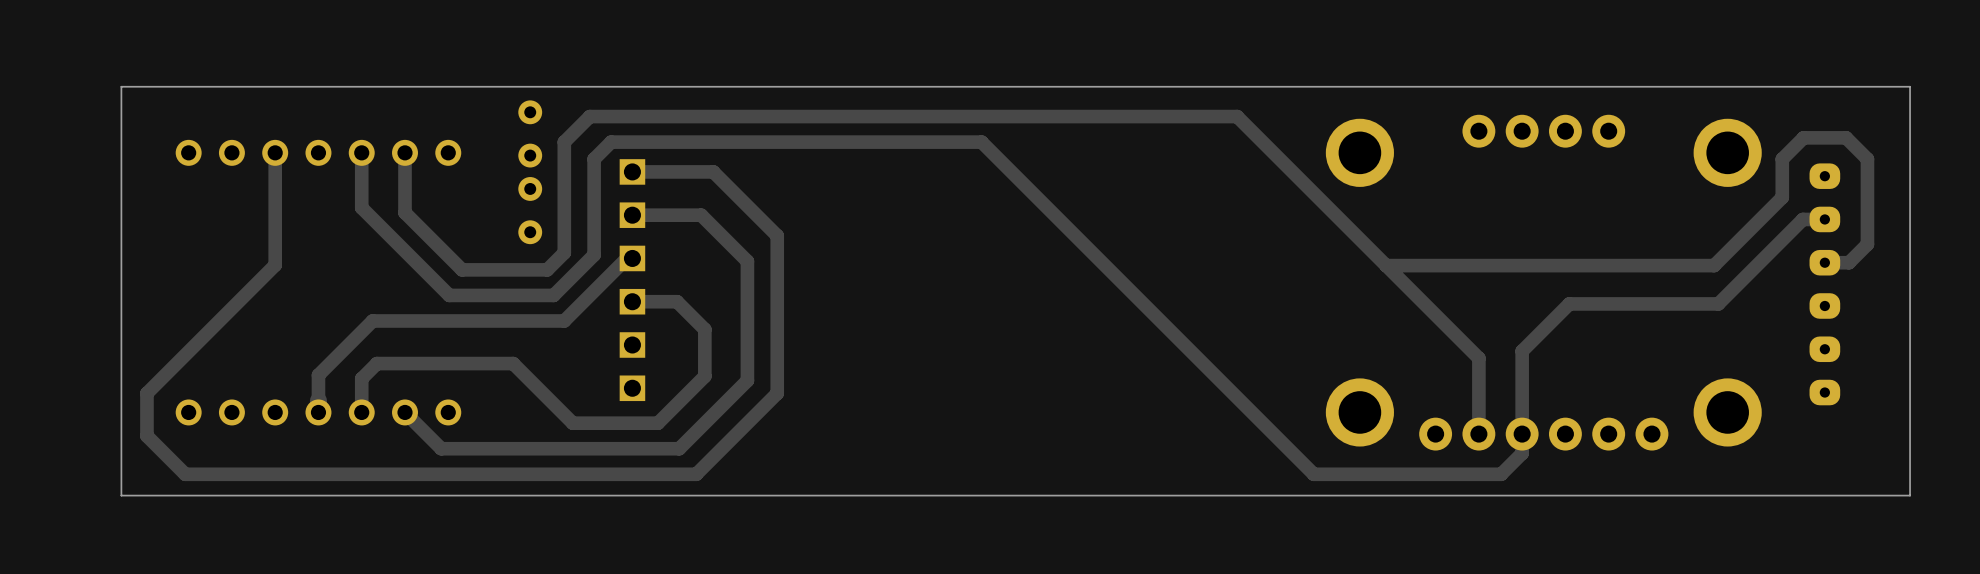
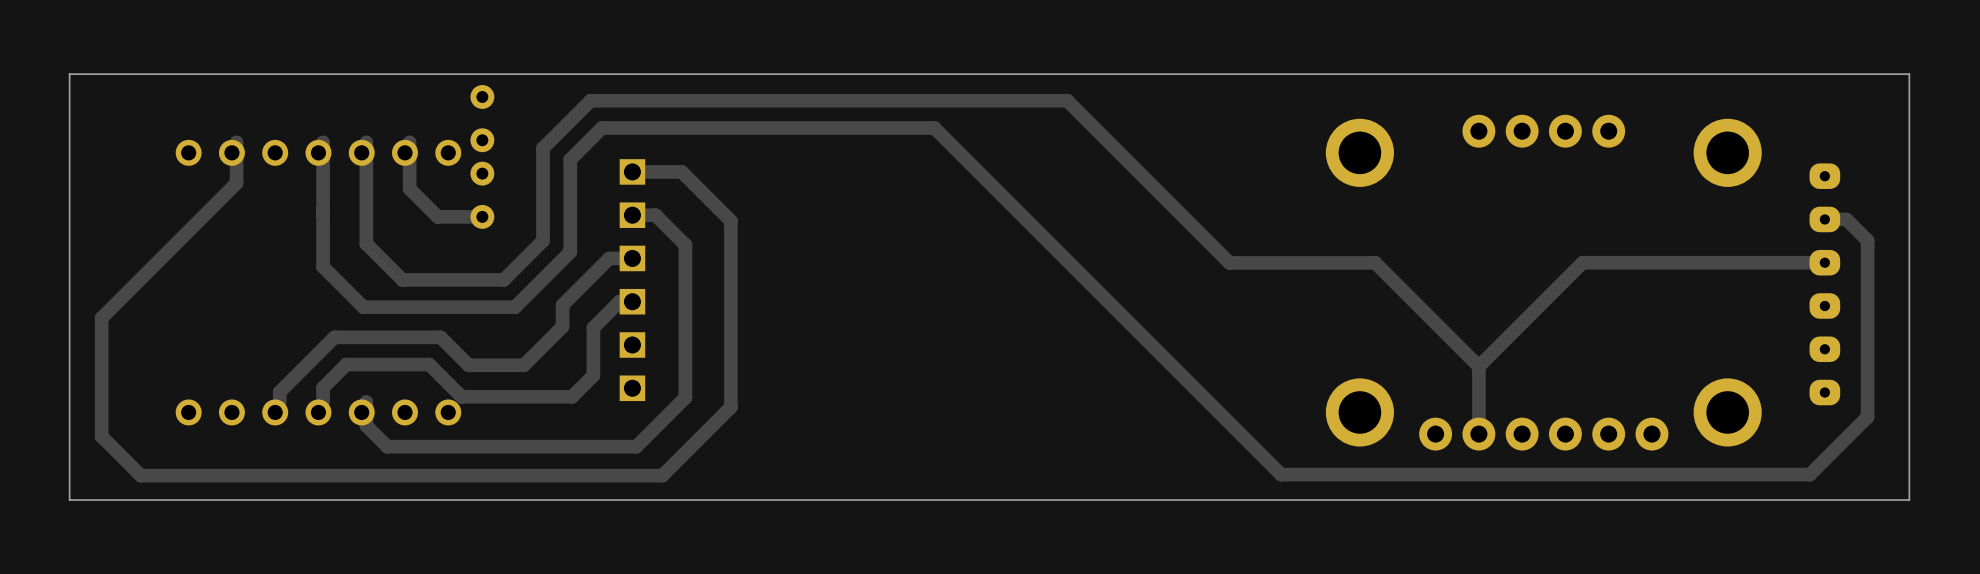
board edge: (1910, 86) (121, 86) (121, 495) (1910, 495) (1910, 86) -> (1909, 74) (1909, 500) (69, 500) (69, 74) (1909, 74)
part: none -> (482, 118)
part: (530, 133) -> none
track: none -> (409, 142) (409, 188) (437, 216) (482, 216)
track: (275, 152) (275, 265) (146, 393) (146, 435) (185, 474) (696, 474) (777, 393) (777, 235) (713, 171) (681, 171) -> (236, 142) (236, 183) (101, 318) (101, 436) (140, 475) (662, 475) (730, 407) (730, 220) (681, 171)
track: (361, 152) (361, 207) (449, 295) (553, 295) (594, 254) (594, 159) (611, 142) (981, 142) (1313, 474) (1501, 474) (1522, 453) (1522, 351) (1569, 303) (1718, 303) (1802, 219) (1824, 219) -> (323, 142) (323, 266) (363, 307) (515, 307) (570, 251) (570, 159) (601, 127) (934, 127) (1281, 474) (1809, 474) (1867, 416) (1867, 240) (1846, 219) (1824, 219)
track: (405, 152) (405, 212) (462, 269) (547, 269) (564, 252) (564, 142) (589, 116) (1237, 116) (1478, 358) (1478, 366) -> none
part: none -> (482, 195)
part: (530, 210) -> none
track: (655, 215) (701, 215) (747, 261) (747, 380) (679, 448) (441, 448) (405, 412) -> (655, 215) (685, 245) (685, 397) (636, 446) (387, 446) (366, 425) (366, 401)
track: (626, 258) (564, 320) (372, 320) (318, 375) (318, 412) (318, 400) -> (626, 258) (609, 258) (562, 305) (562, 326) (523, 365) (468, 365) (440, 337) (334, 337) (279, 392) (279, 401)
track: (1824, 262) (1849, 262) (1867, 244) (1867, 159) (1846, 137) (1803, 137) (1782, 159) (1782, 197) (1714, 265) (1386, 265) -> (1824, 262) (1582, 262) (1478, 366) (1375, 262) (1229, 262) (1067, 100) (590, 100) (542, 148) (542, 240) (503, 279) (402, 279) (366, 243) (366, 142)
track: (632, 301) (677, 301) (704, 329) (704, 376) (657, 423) (572, 423) (513, 363) (376, 363) (361, 378) (361, 412) -> (632, 301) (619, 301) (593, 327) (593, 375) (572, 396) (461, 396) (429, 364) (346, 364) (323, 387) (323, 401)

